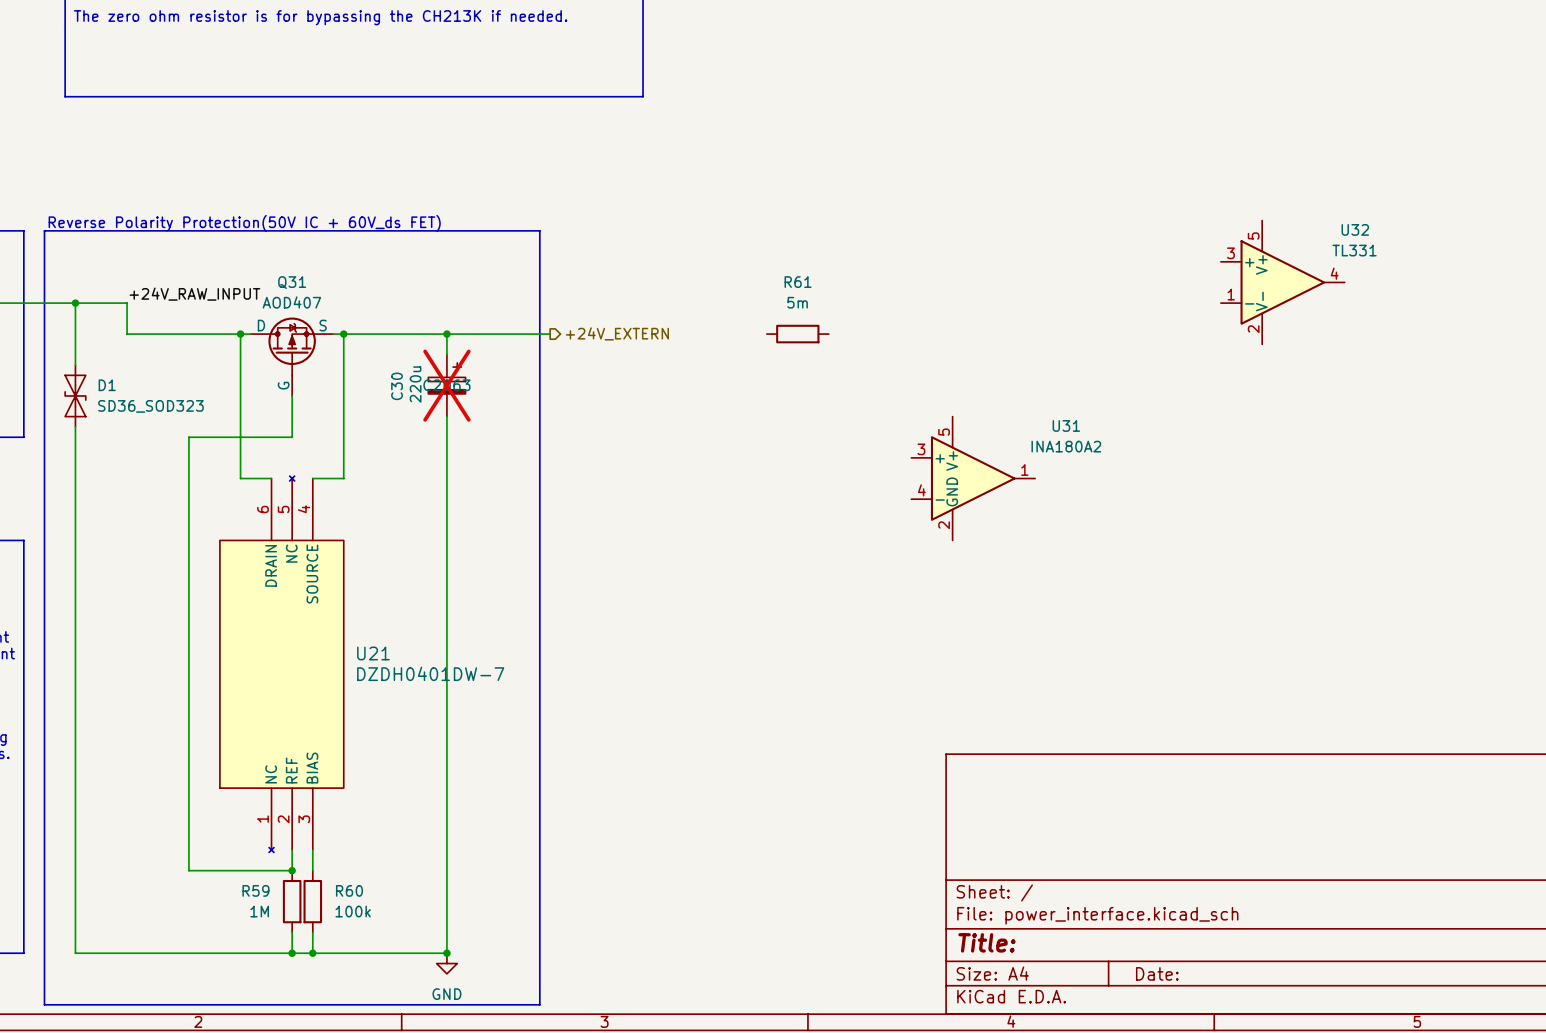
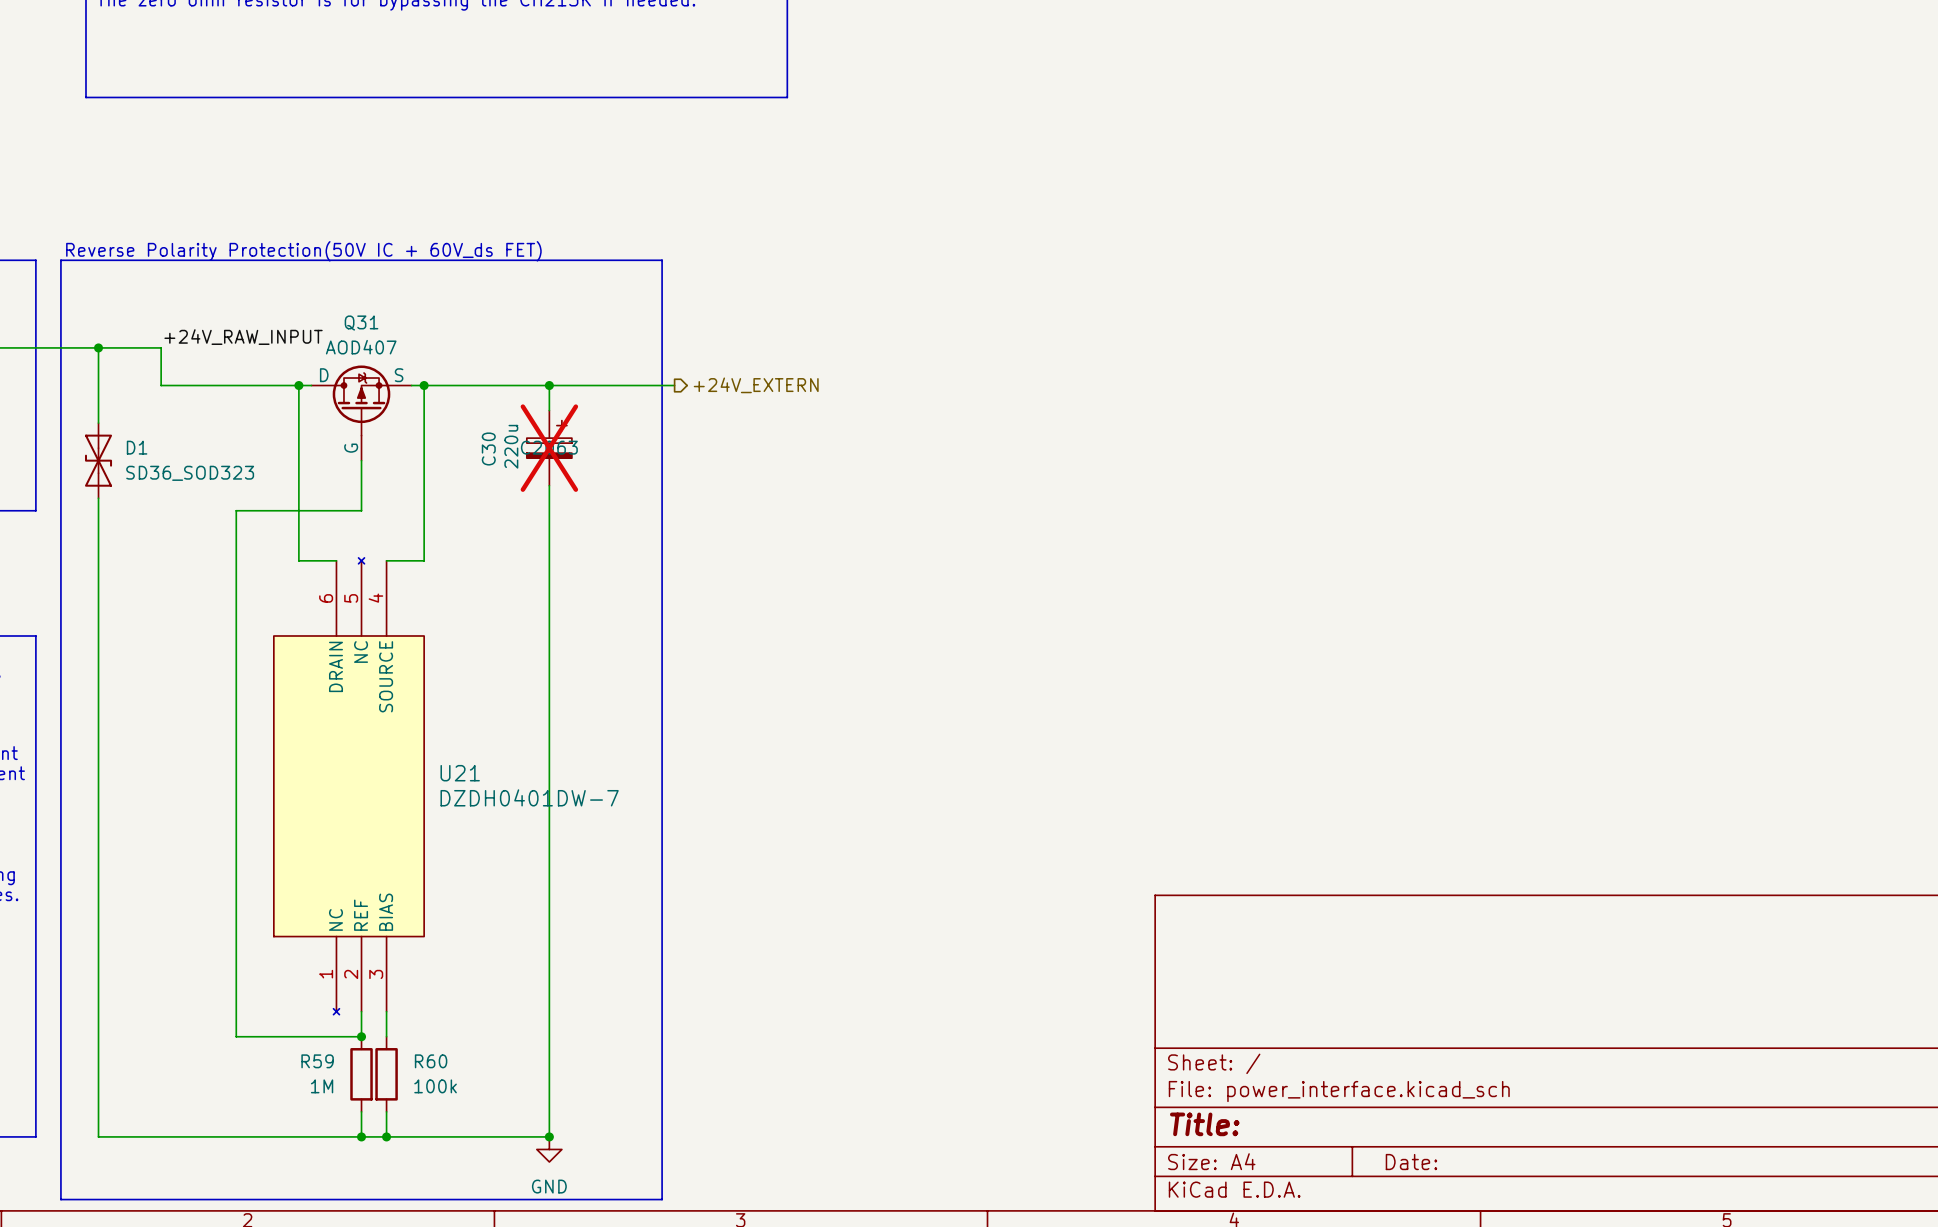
U32: TL331 (1282, 282) -> none
R61: 5m (797, 334) -> none
U31: INA180A2 (973, 478) -> none

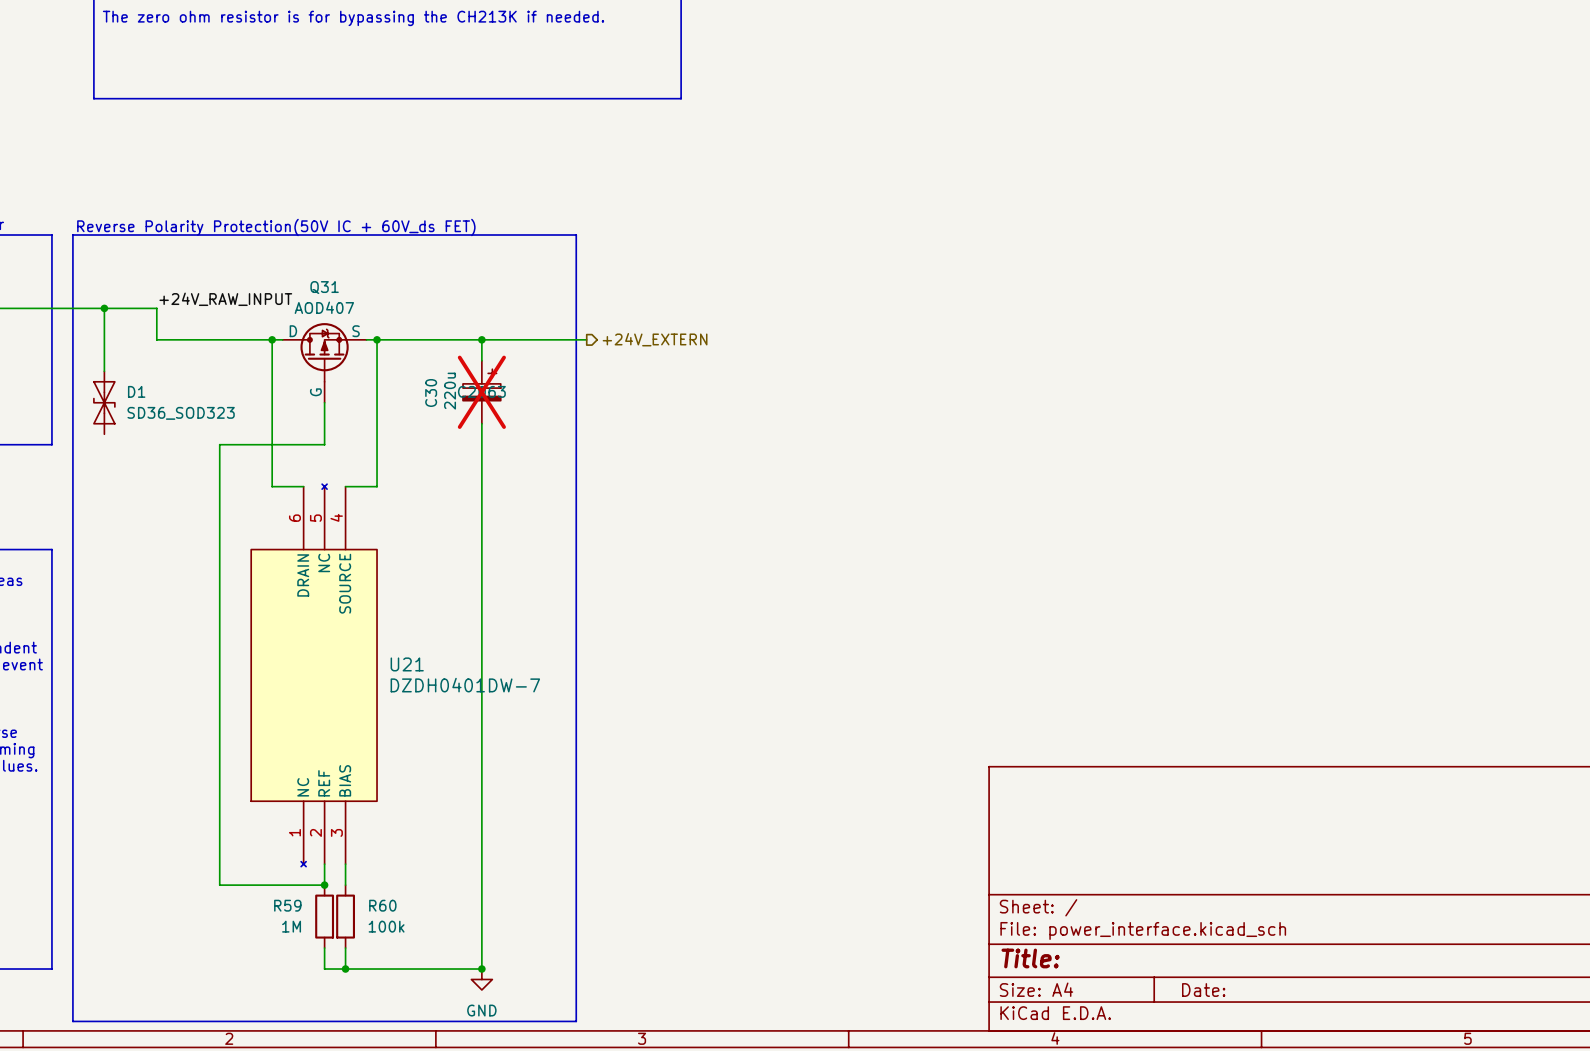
wire: (98, 498) (98, 1136) (361, 1136) -> none
junction: (361, 1136) -> none

